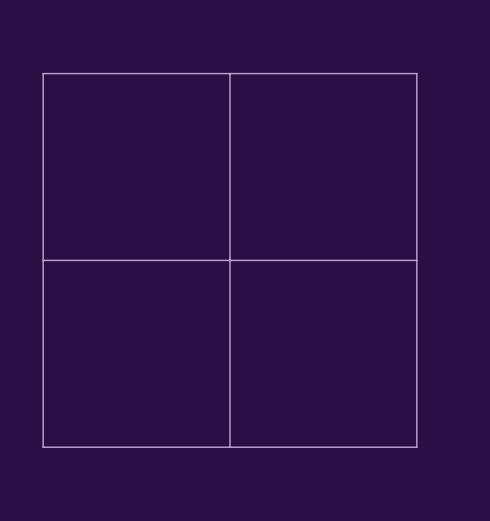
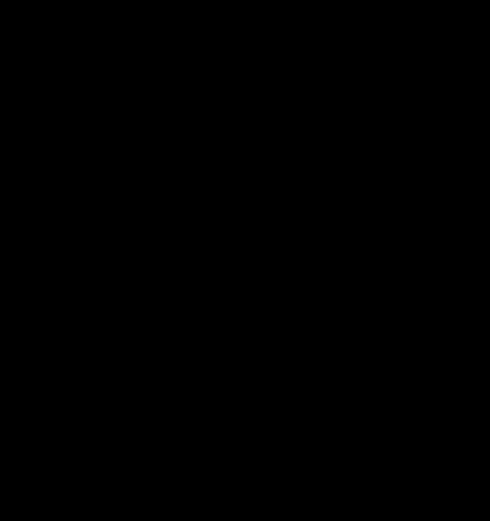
line: (43, 73) (416, 73) (416, 447) (43, 447) (43, 73) -> none
line: (229, 73) (229, 447) -> none
line: (43, 260) (416, 260) -> none

